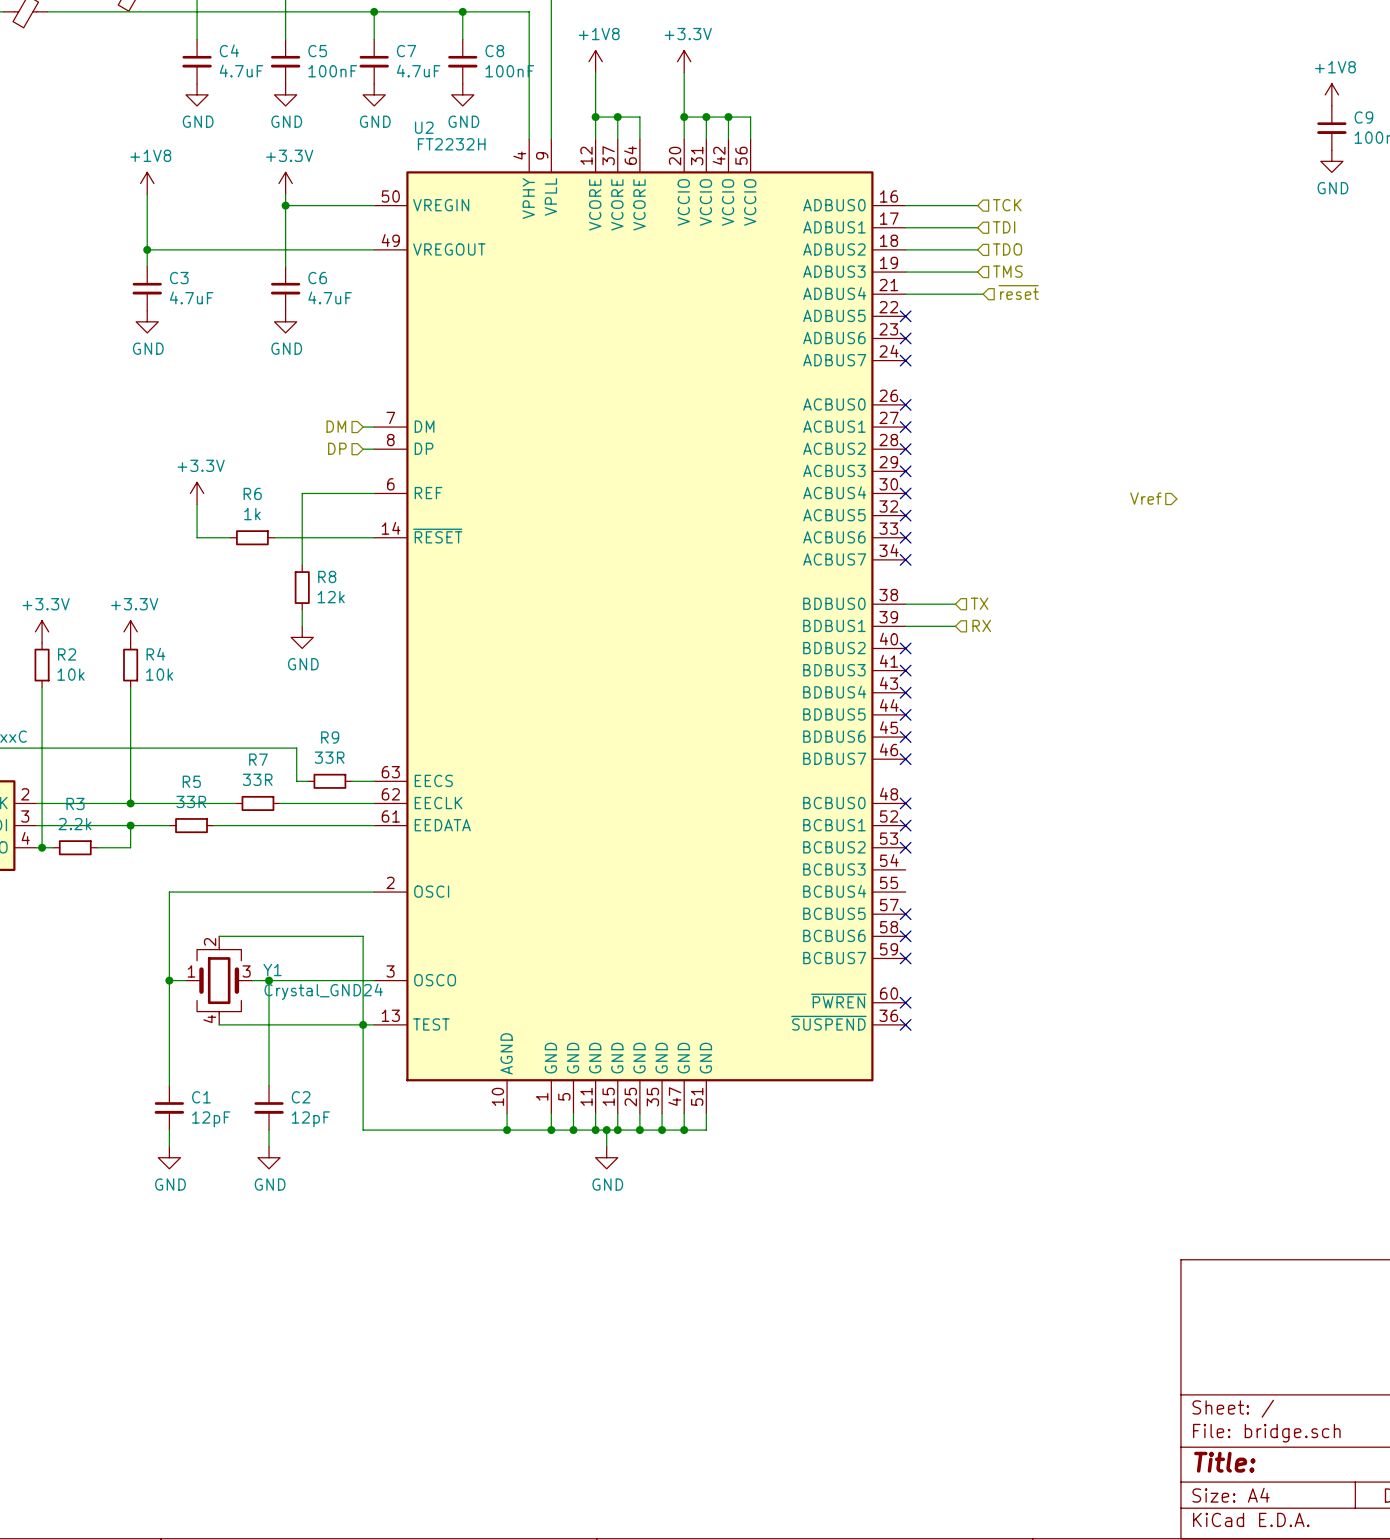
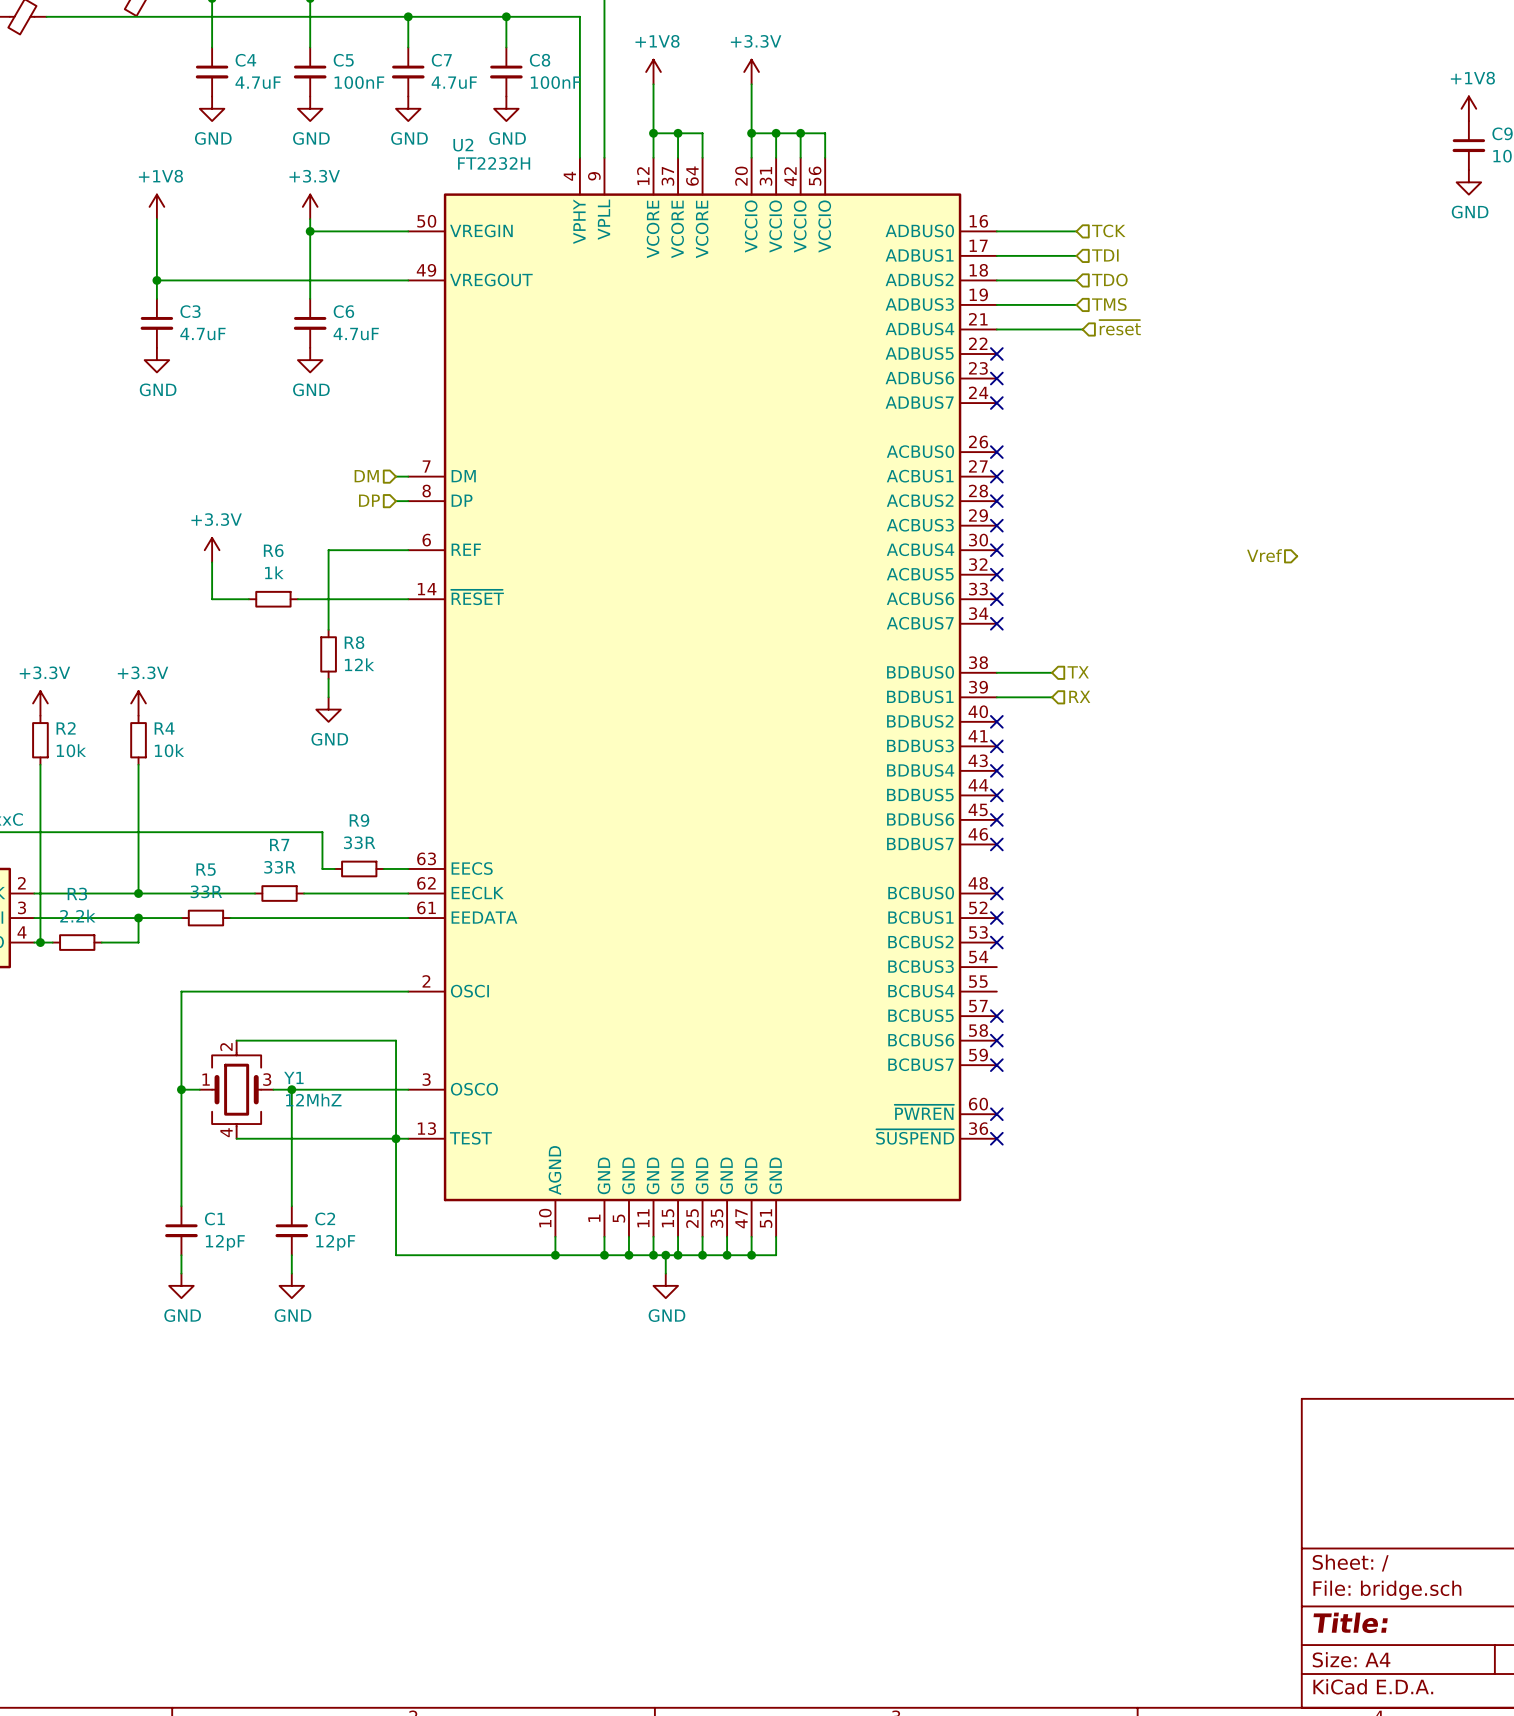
Y1 value: Crystal_GND24 (323, 991) -> 12MhZ (313, 1100)

